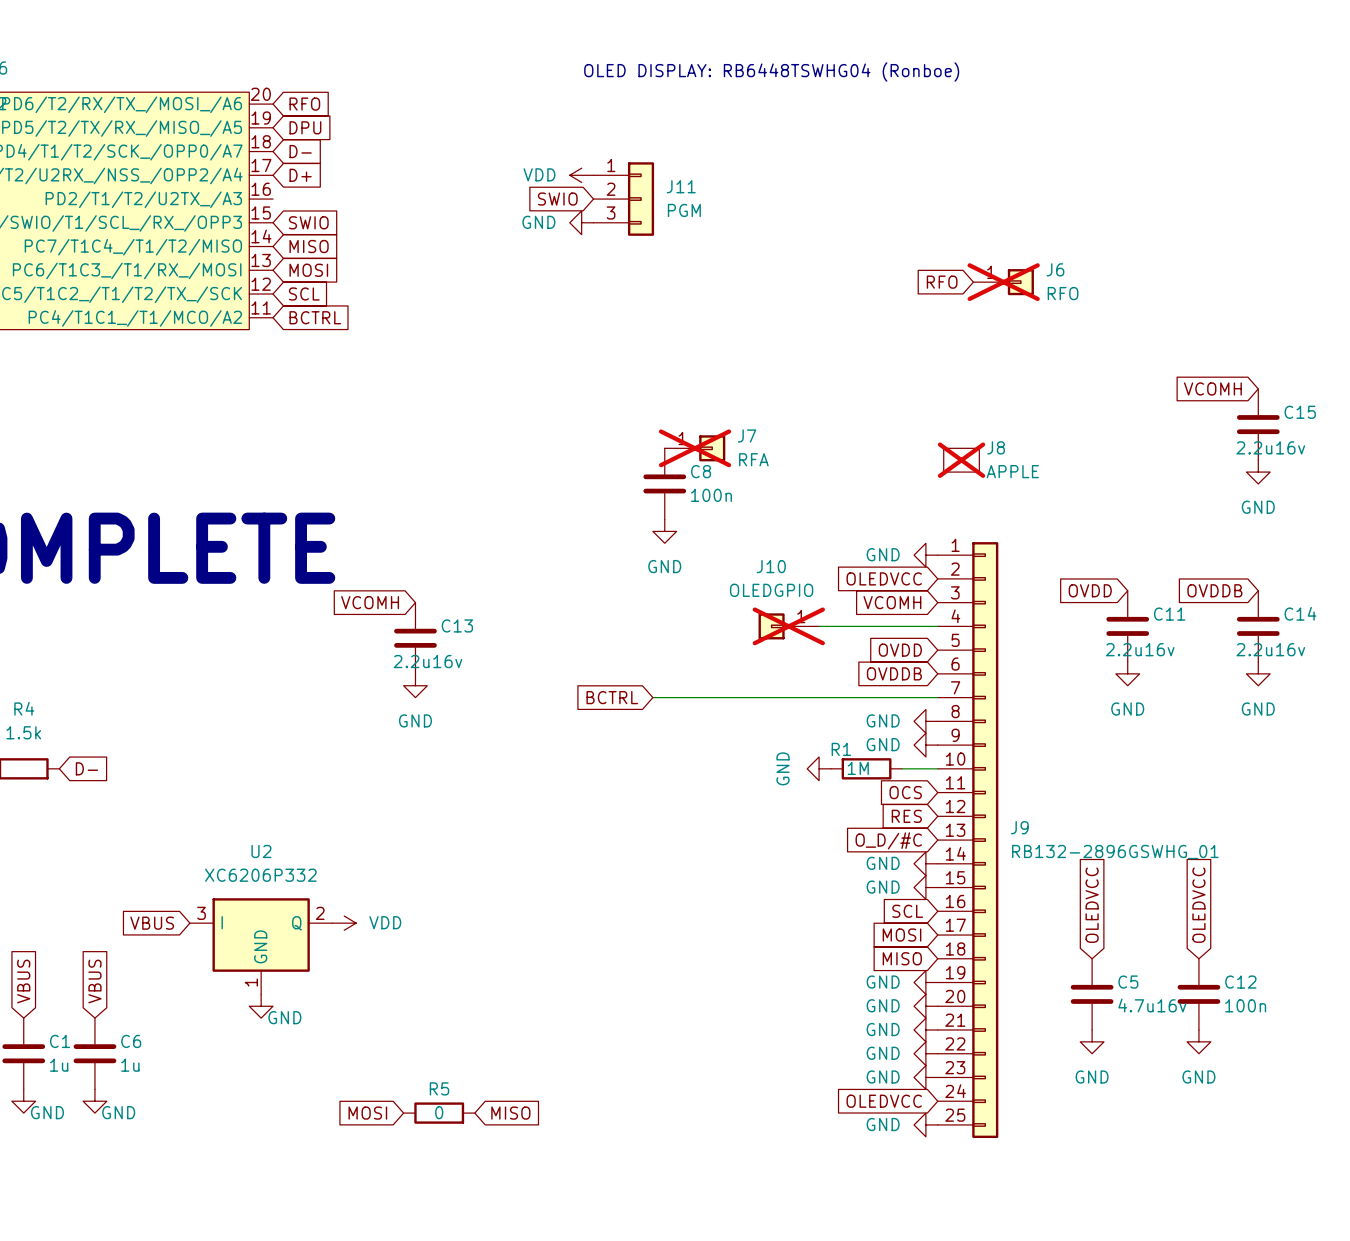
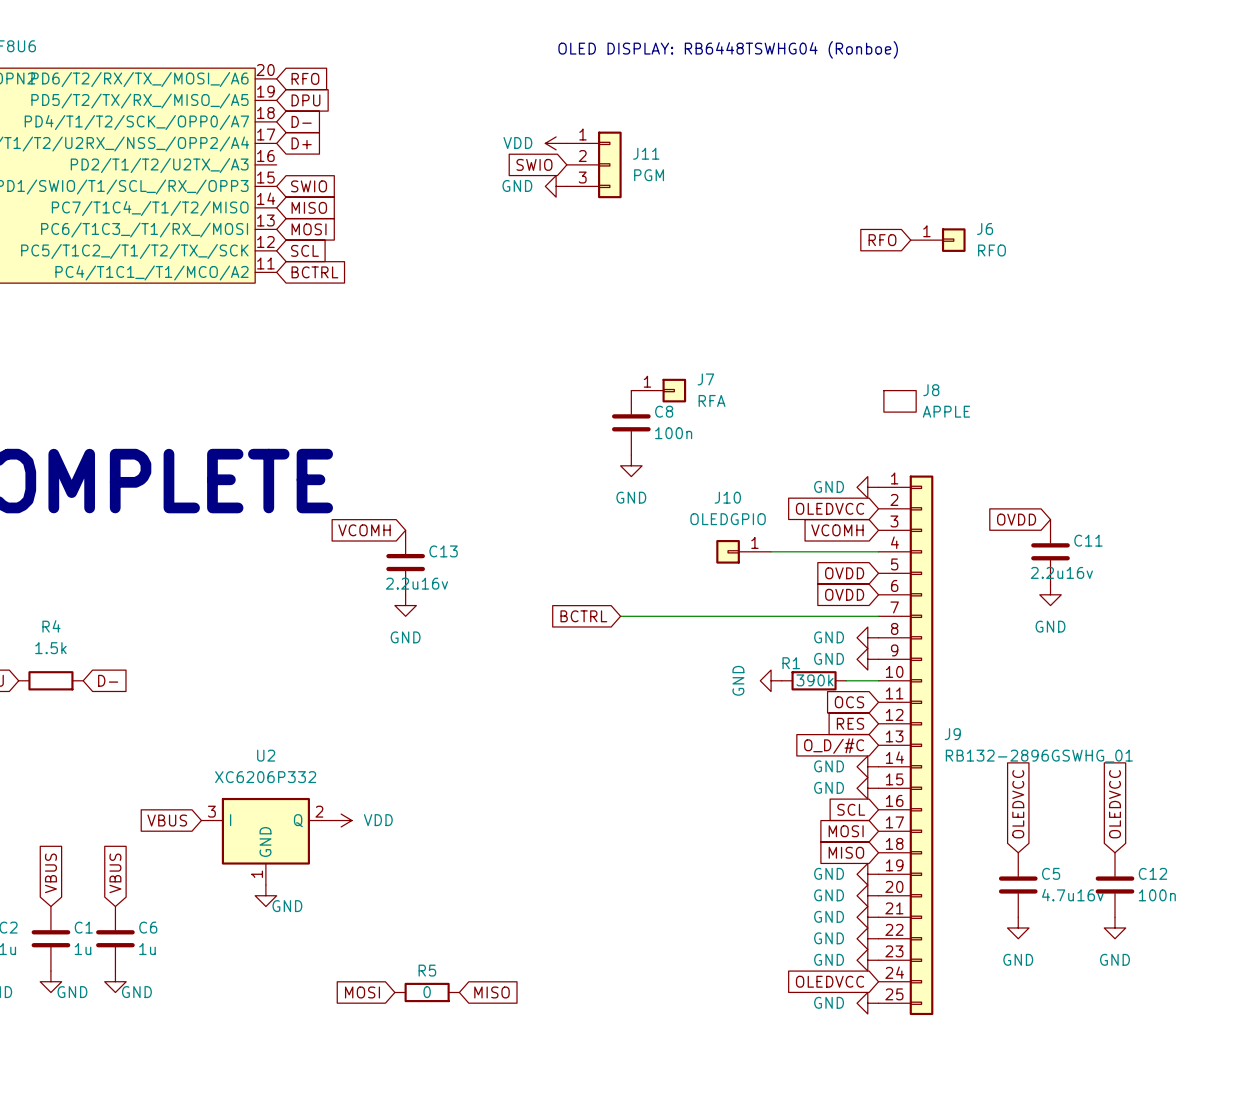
J6 do-not-place cross: (1003, 282) -> none
global label: VCOMH (1212, 388) -> none
C15: 2.2u16v (1258, 424) -> none
J7 do-not-place cross: (695, 448) -> none
J8 do-not-place cross: (961, 460) -> none
power symbol: GND (1258, 472) -> none
global label: OVDDB (1214, 590) -> none
J10 do-not-place cross: (788, 626) -> none
C14: 2.2u16v (1258, 626) -> none
global label: OVDDB (894, 673) -> OVDD (844, 594)
power symbol: GND (1258, 673) -> none
R1 value: 1M (858, 768) -> 390k (815, 680)

